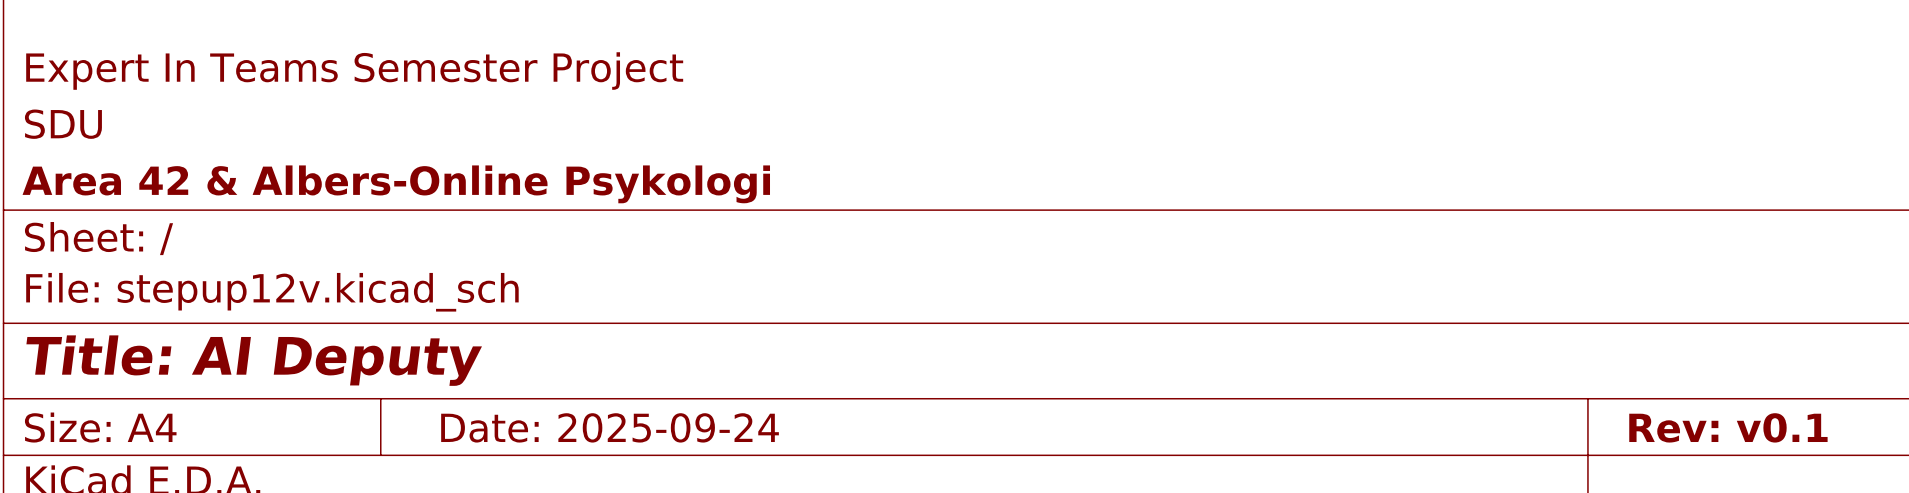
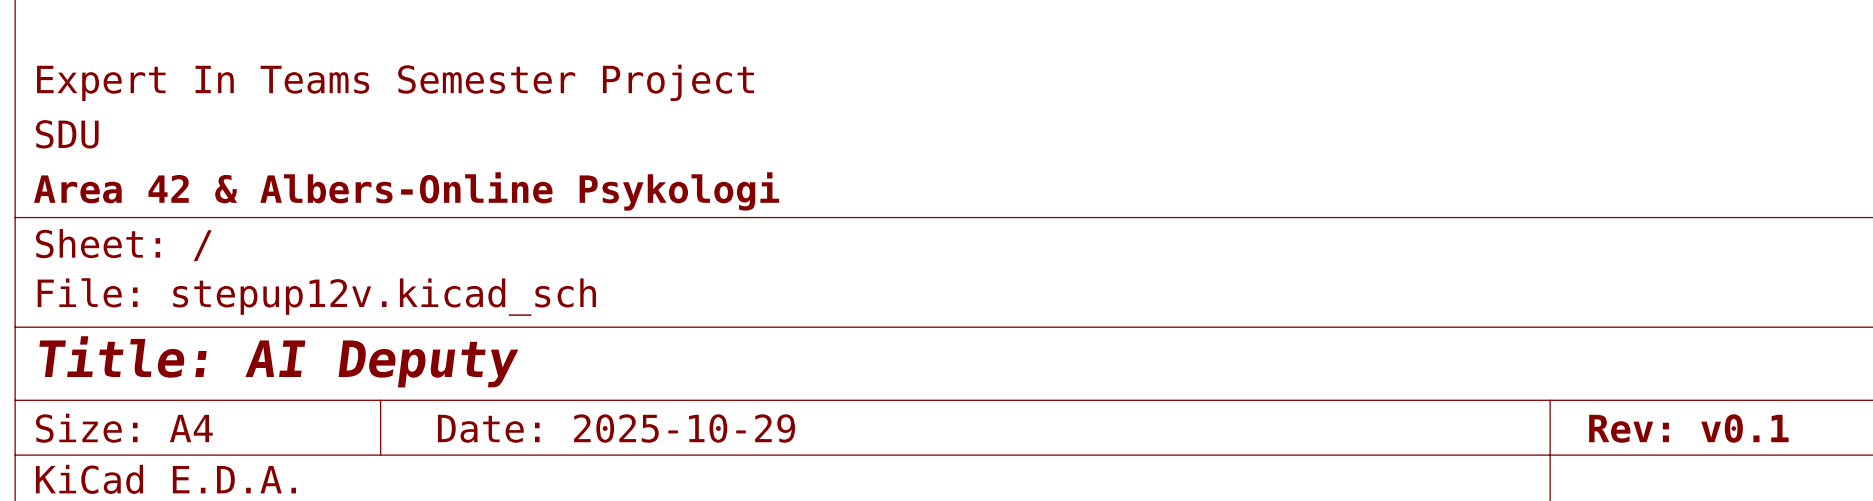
title block: Date: 2025-09-24 (610, 427) -> Date: 2025-10-29 (616, 428)

